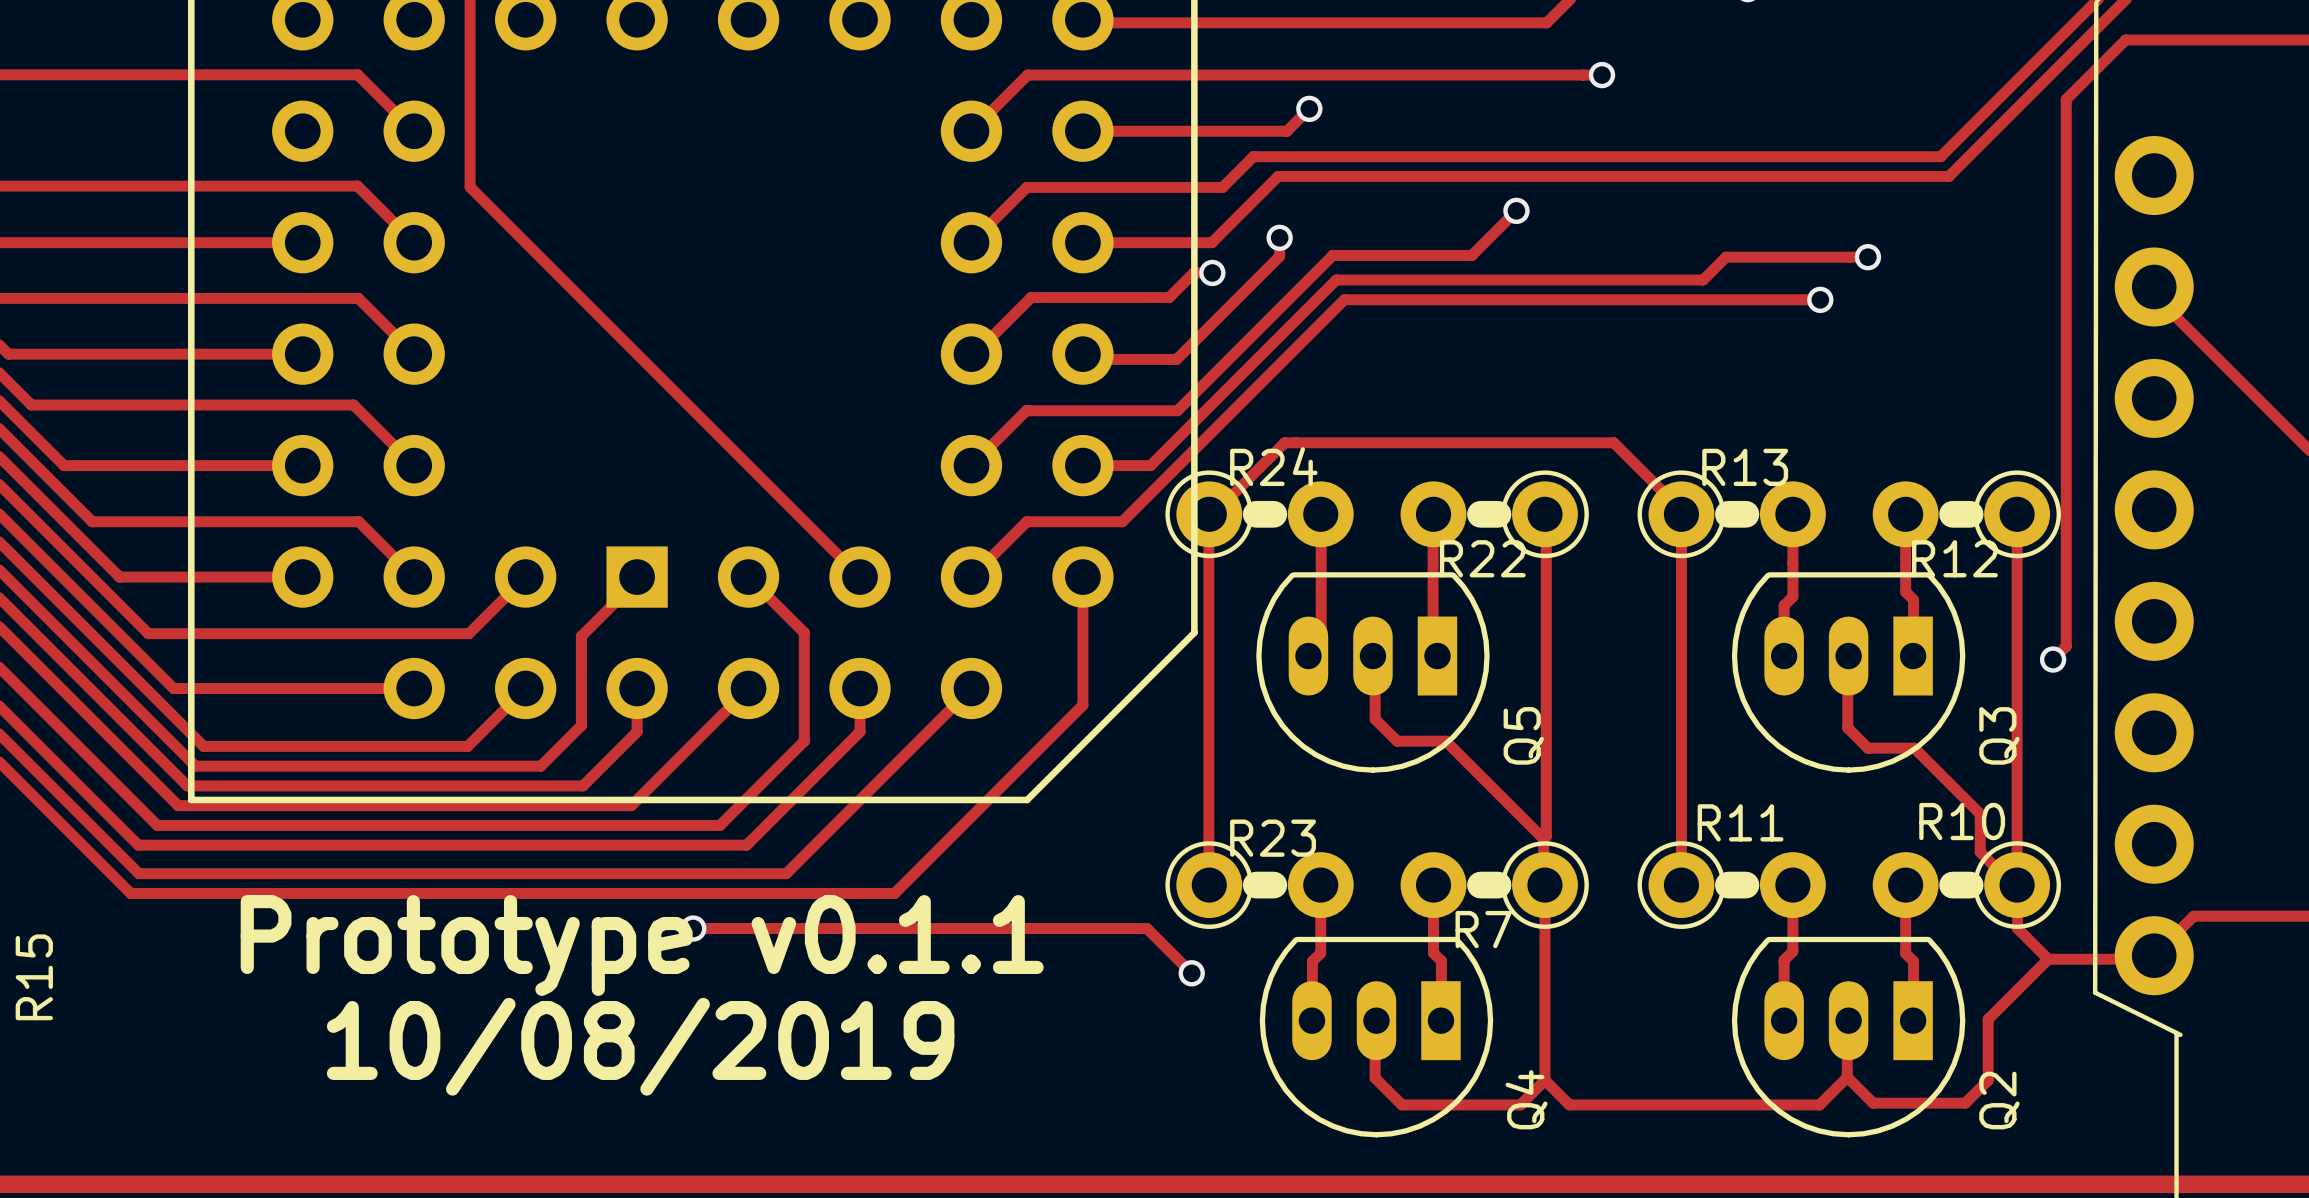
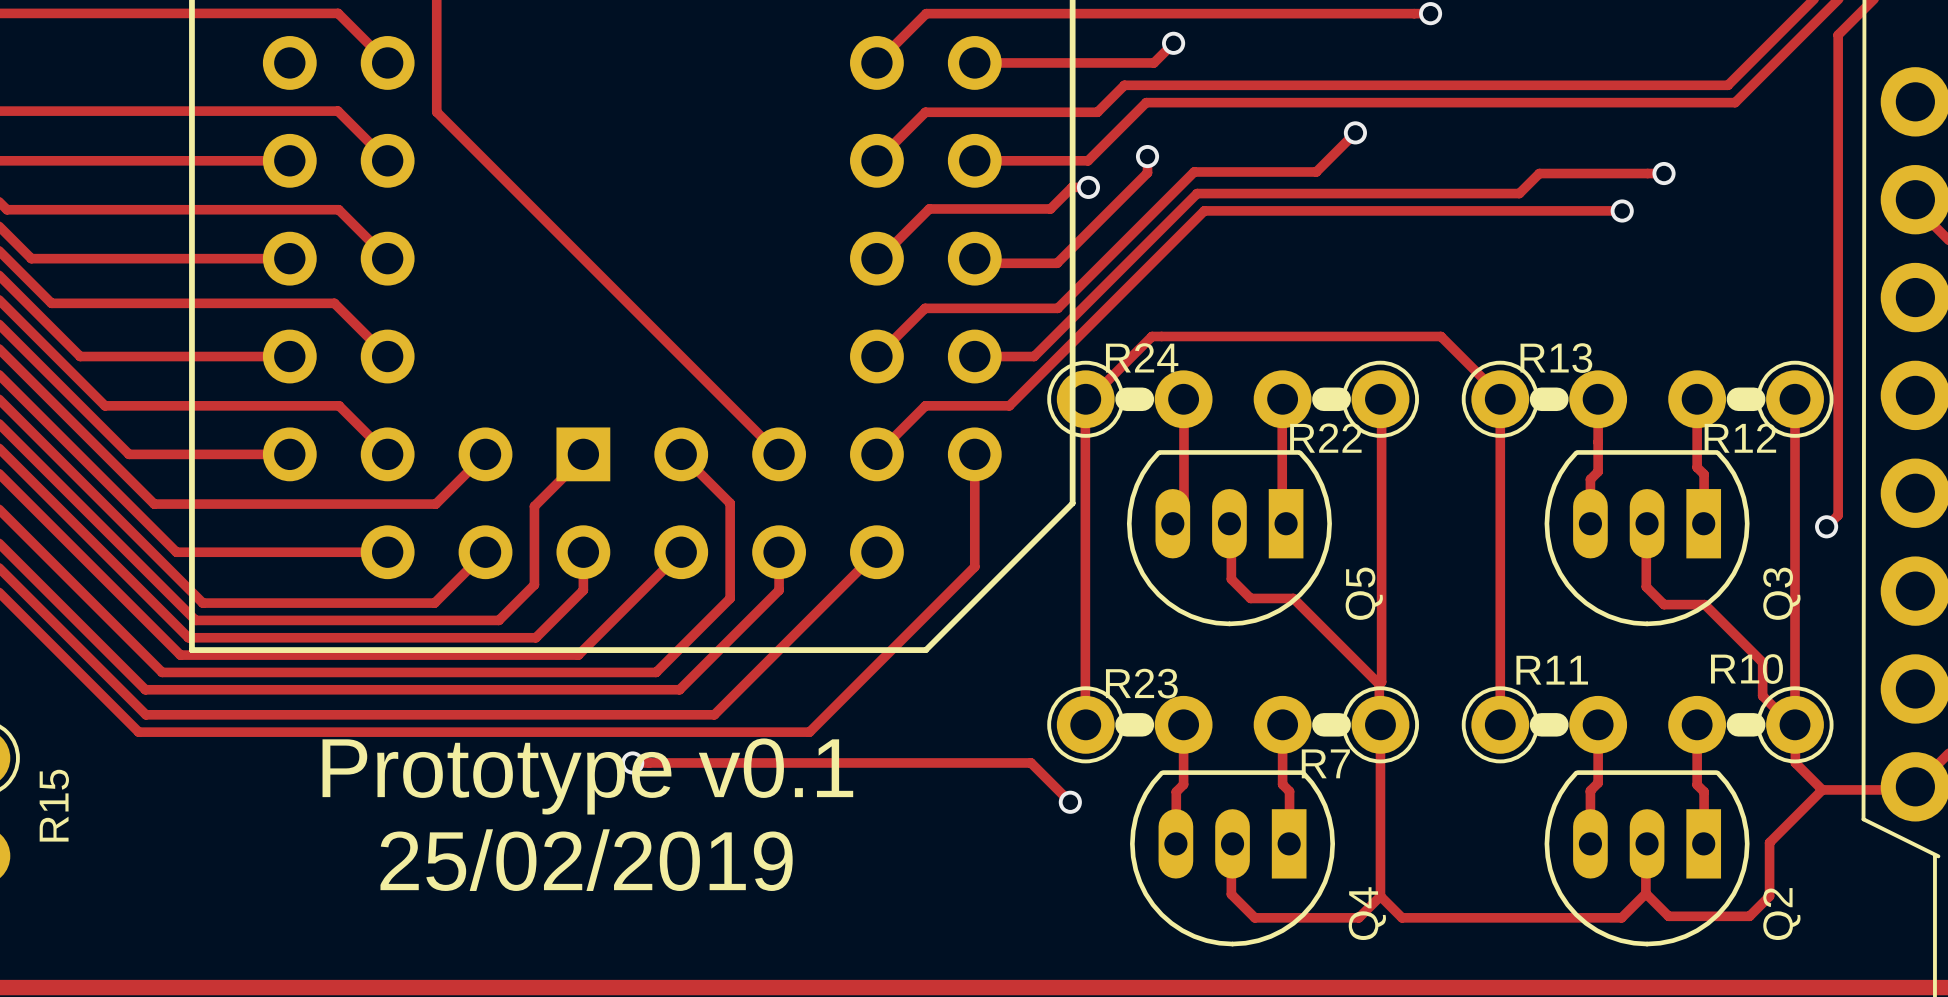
text: Prototype v0.1.1 (642, 945) -> Prototype v0.1 (587, 776)
text: 10/08/2019 (640, 1046) -> 25/02/2019 (586, 860)

